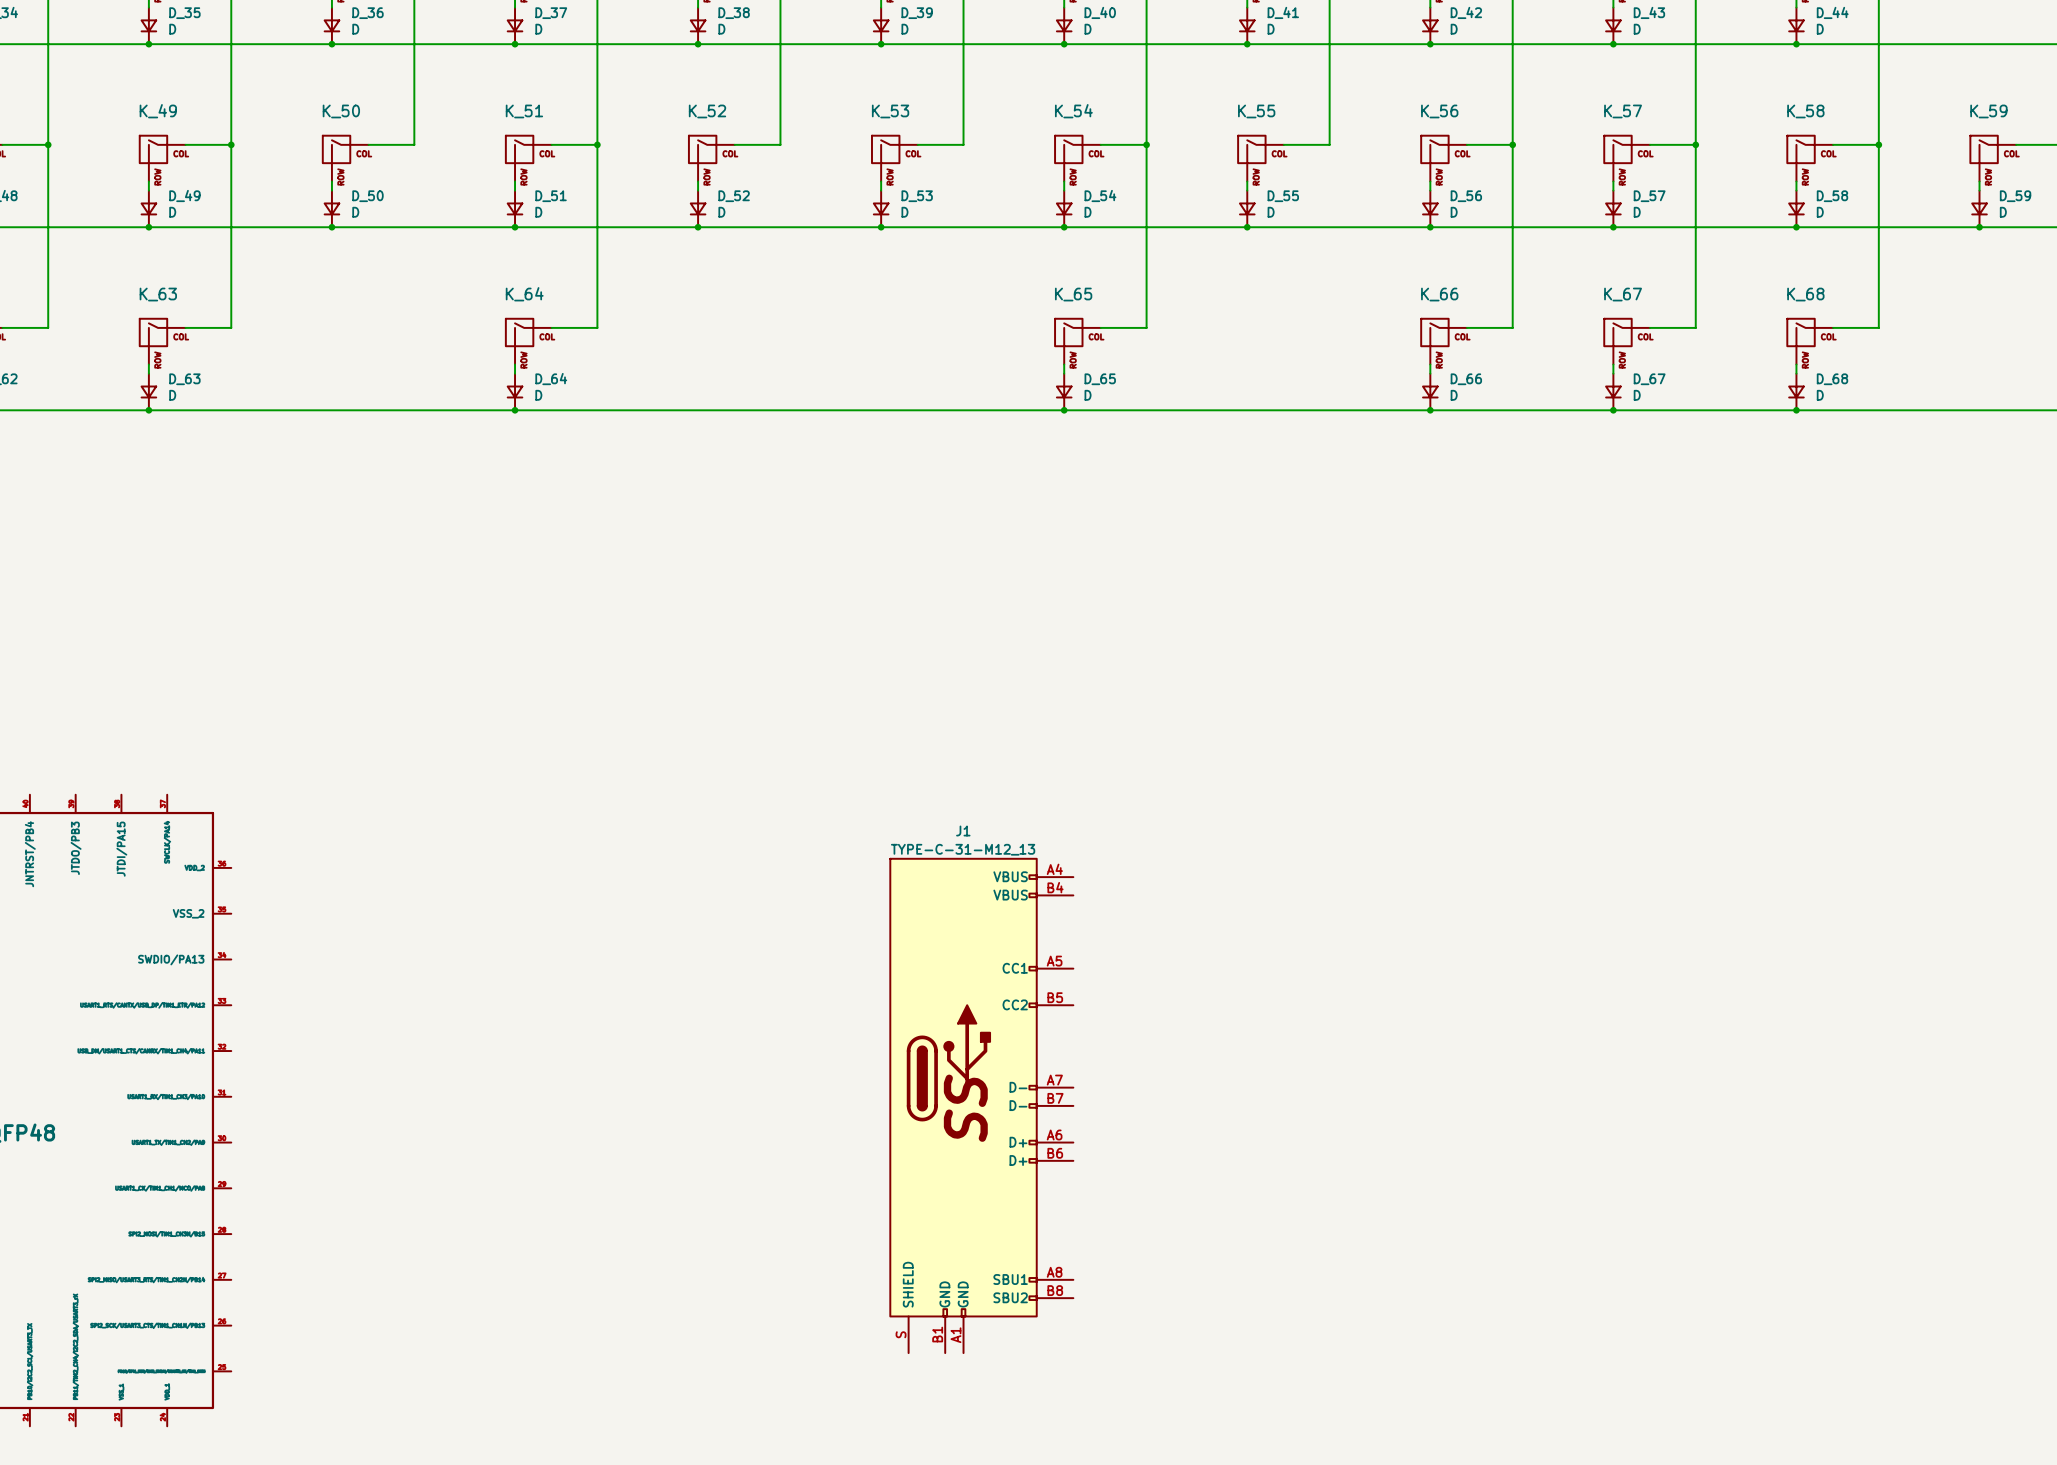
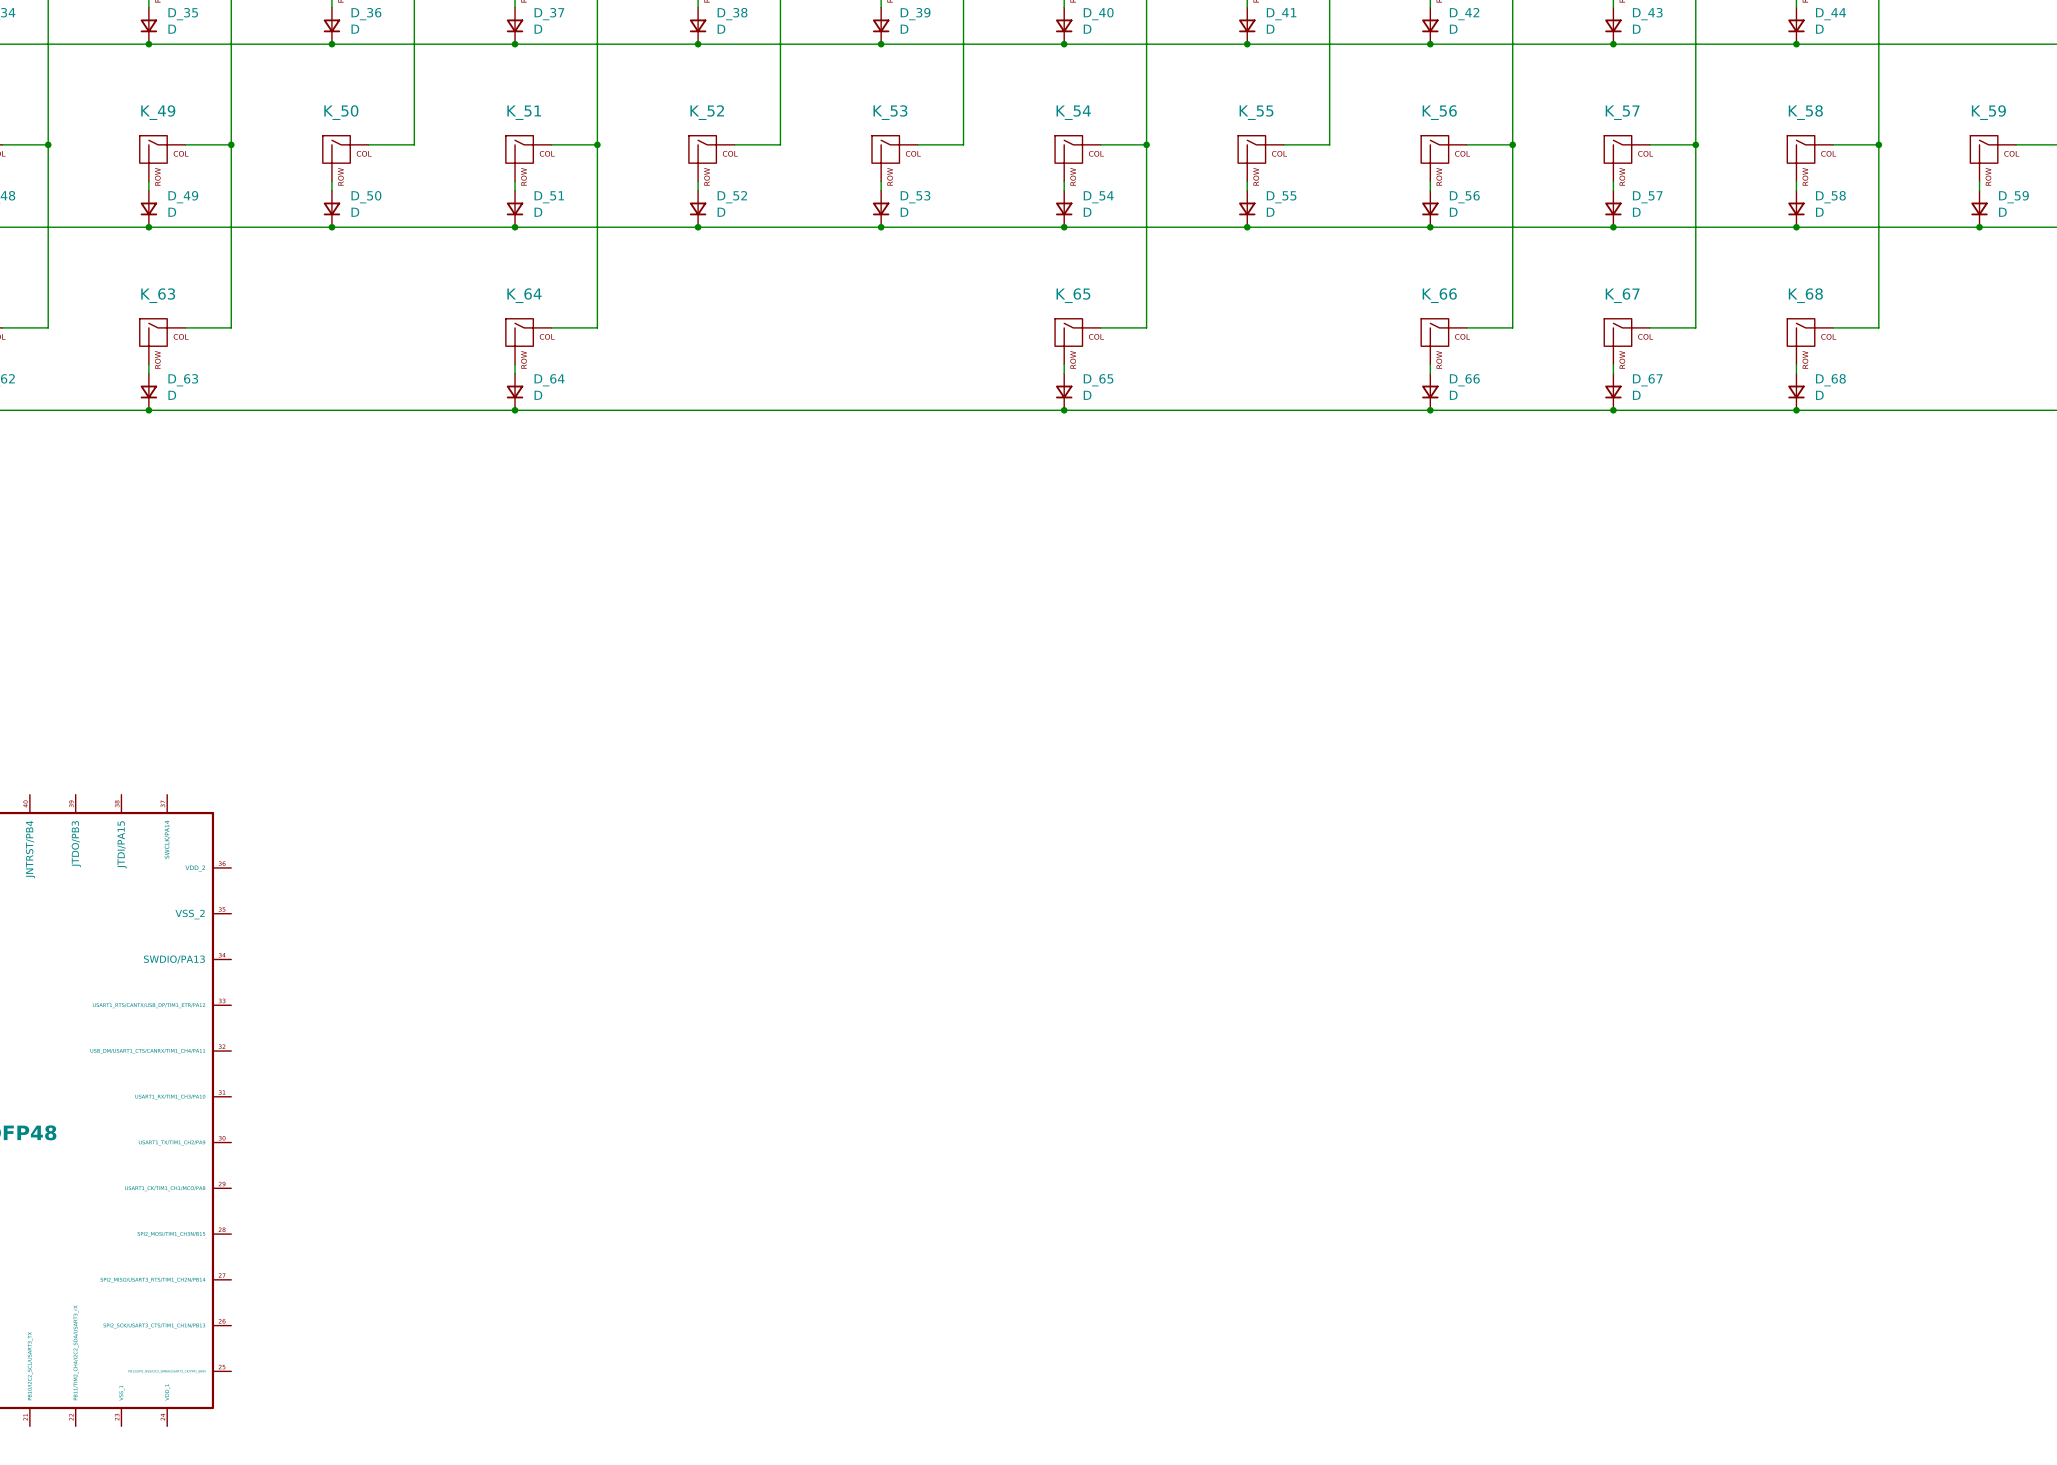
J1: TYPE-C-31-M12_13 (981, 1105) -> none

